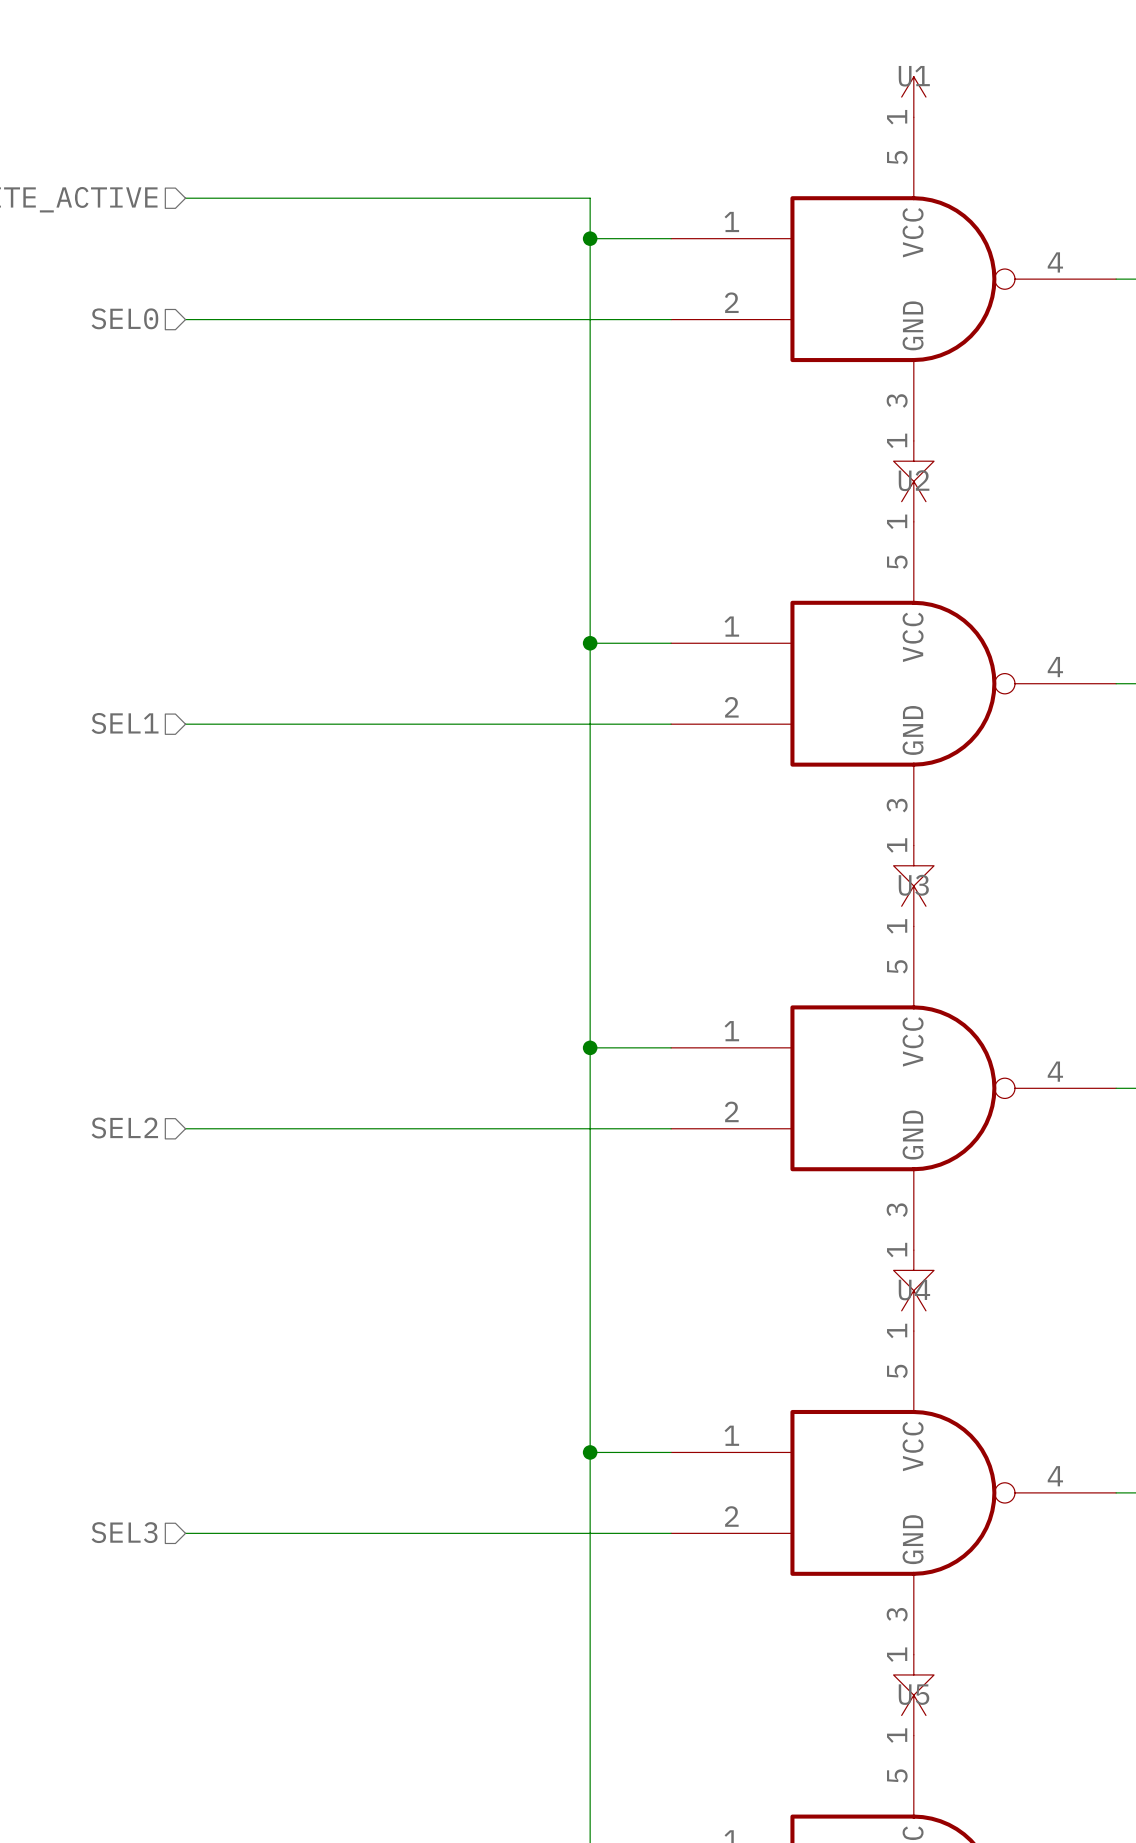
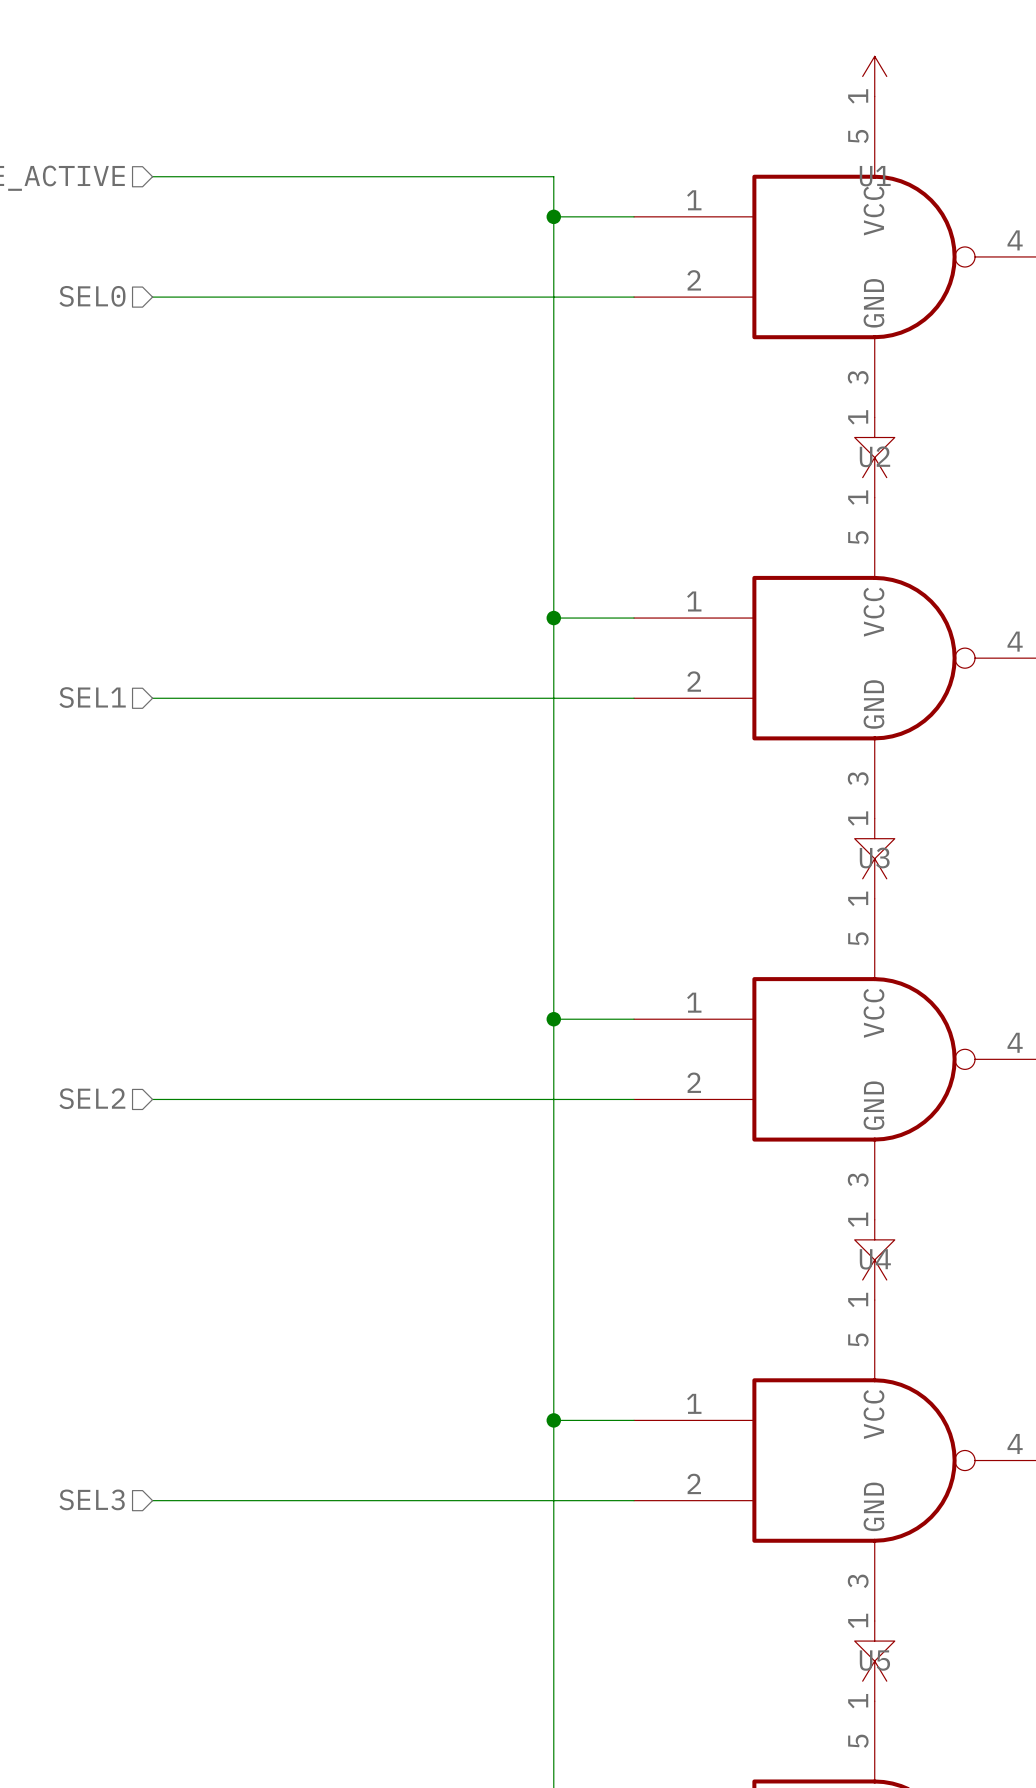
U1 name position: U1 (914, 76) -> U1 (875, 176)

